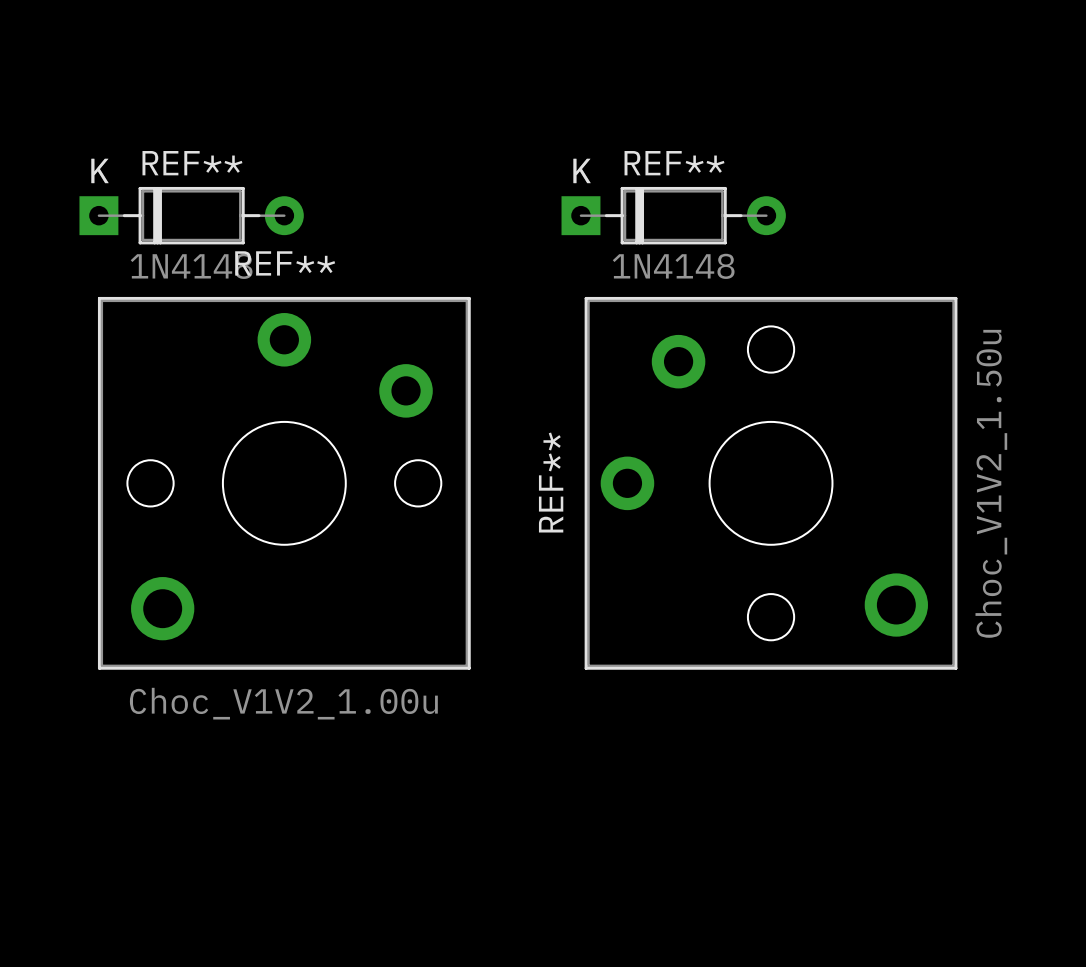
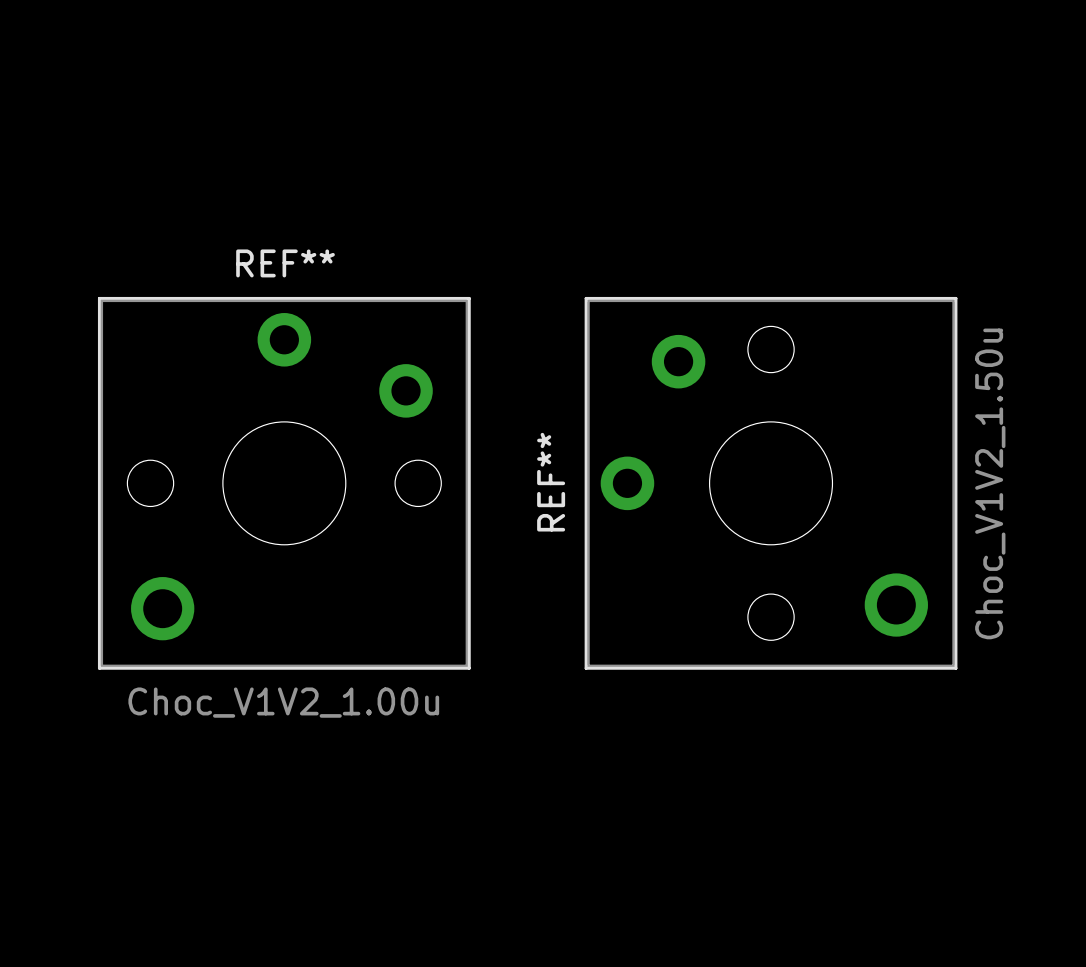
REF**: 1N4148 (191, 215) -> none
REF**: 1N4148 (673, 215) -> none

